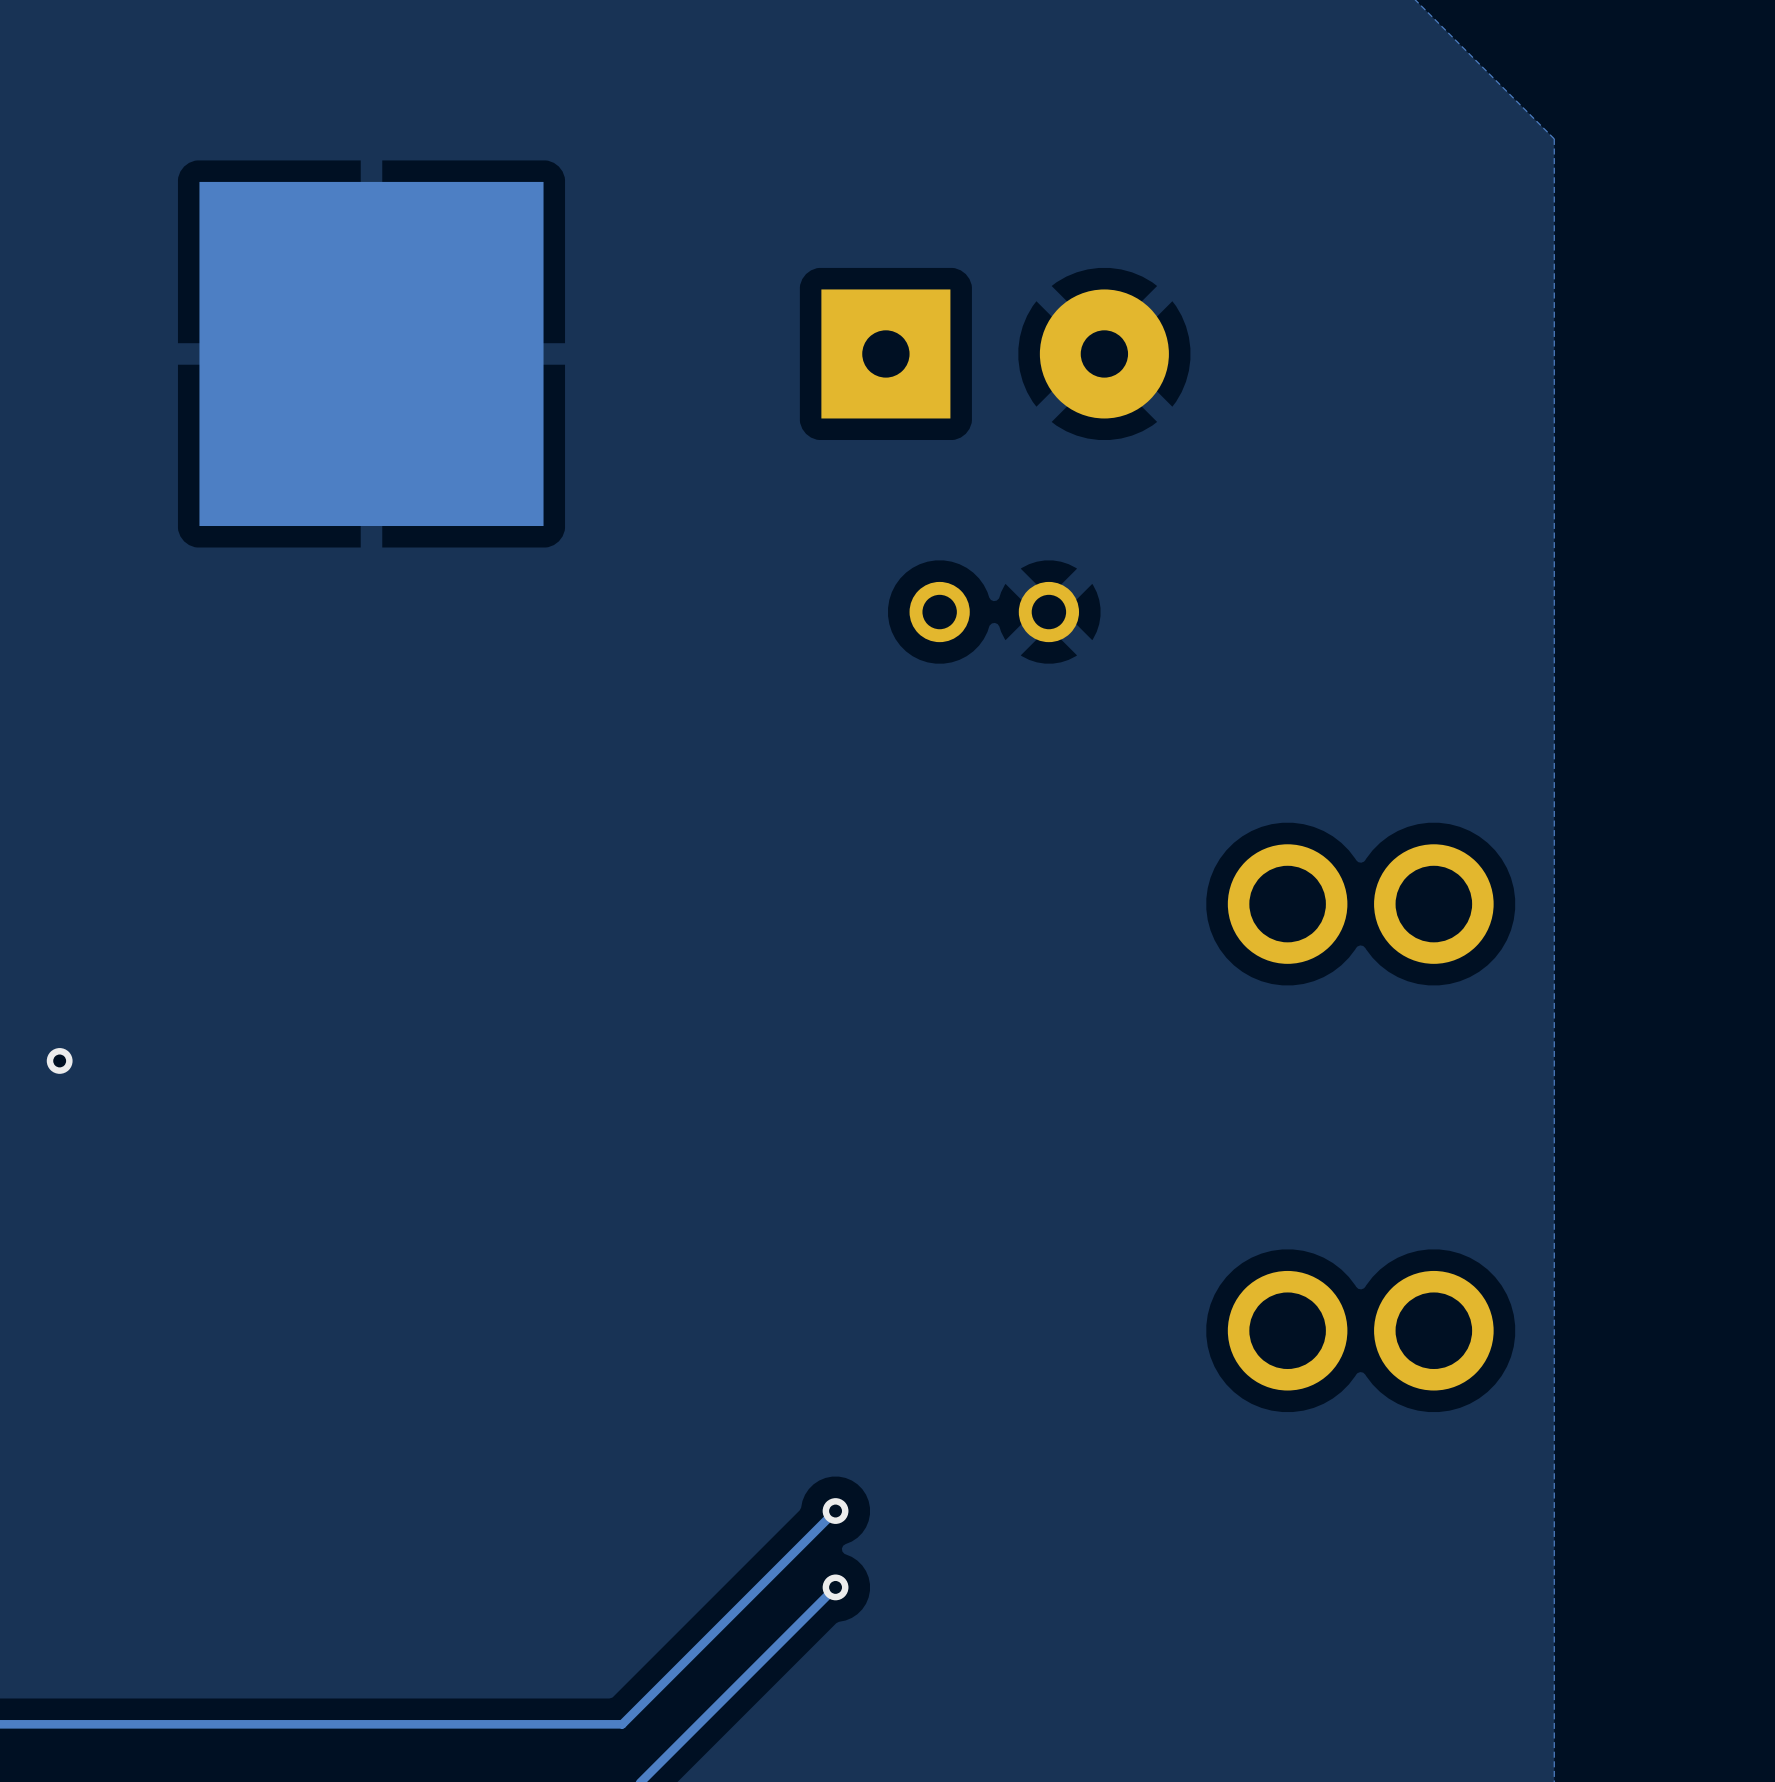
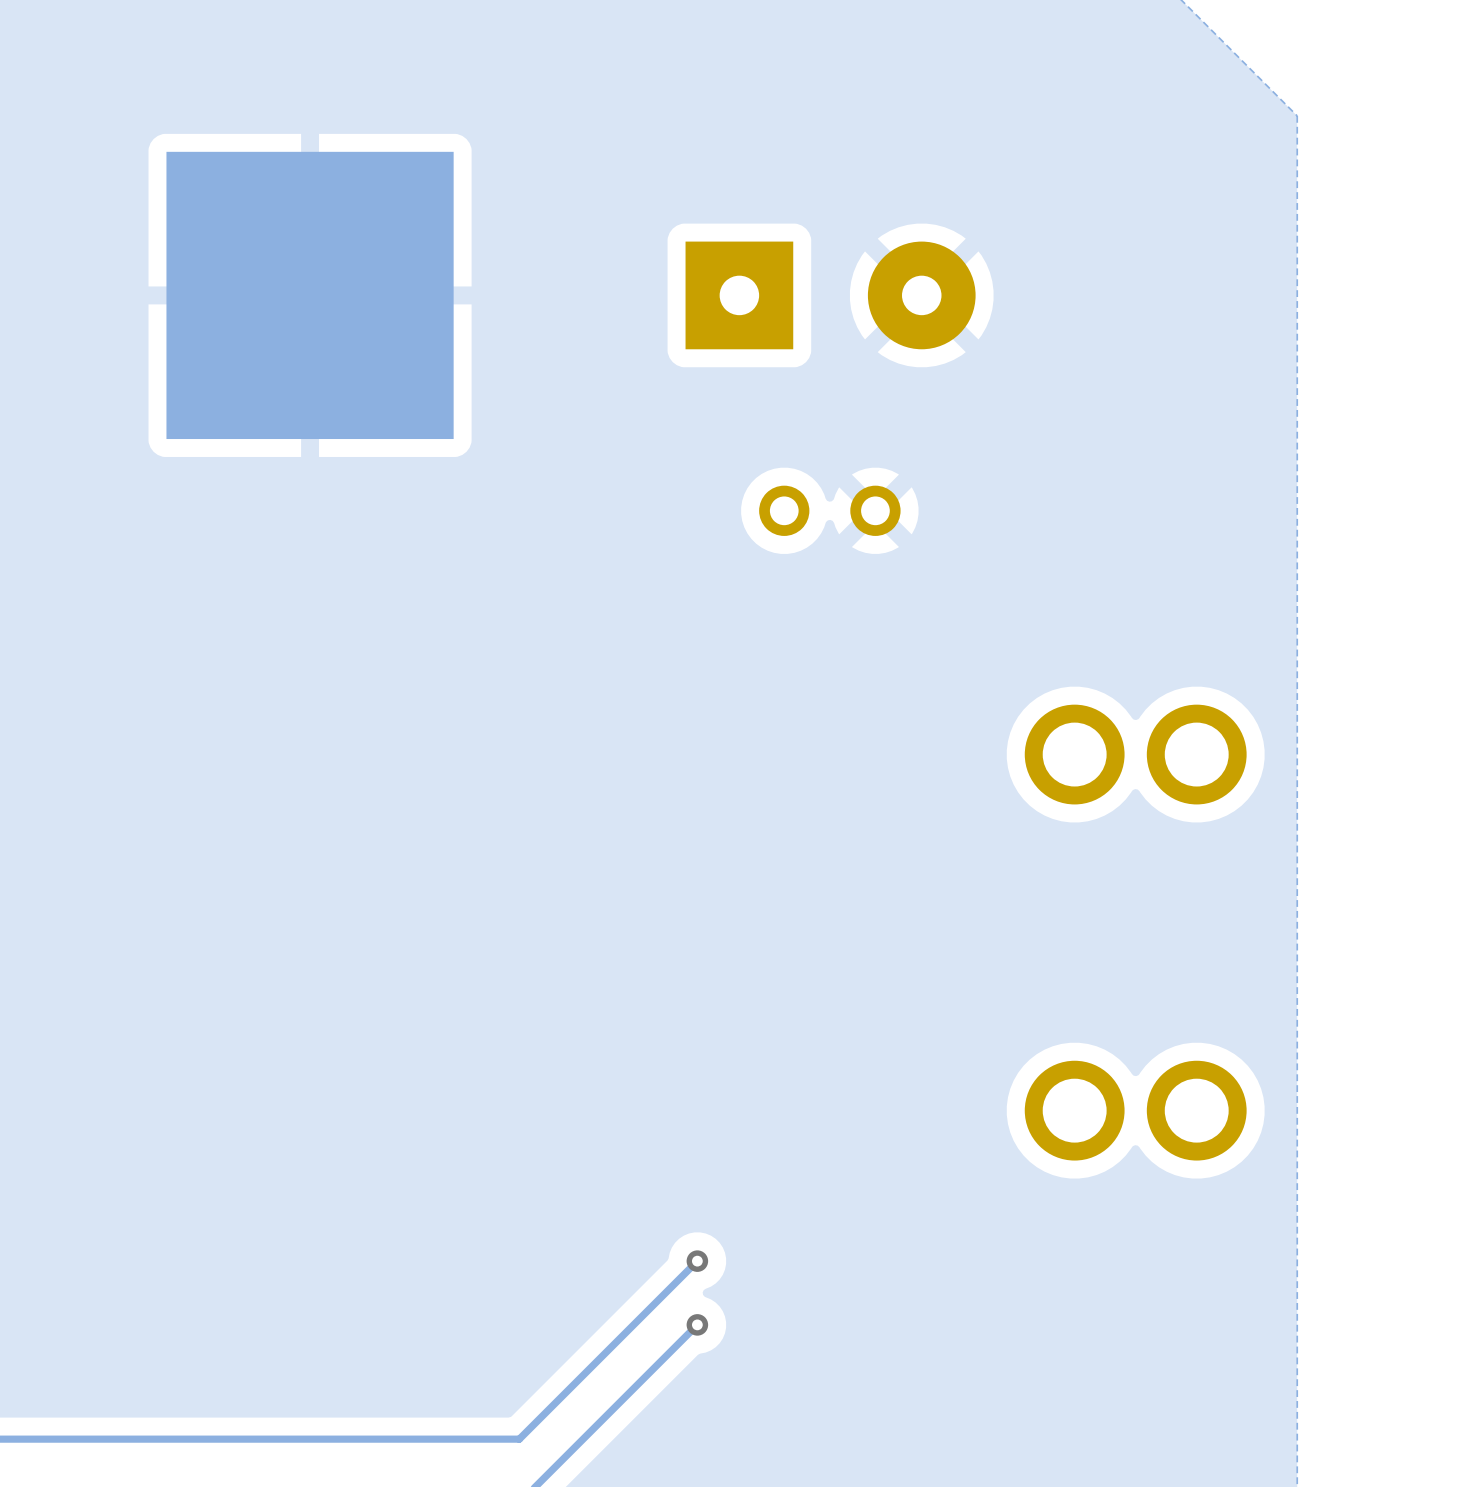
via: (59, 1060) -> none

